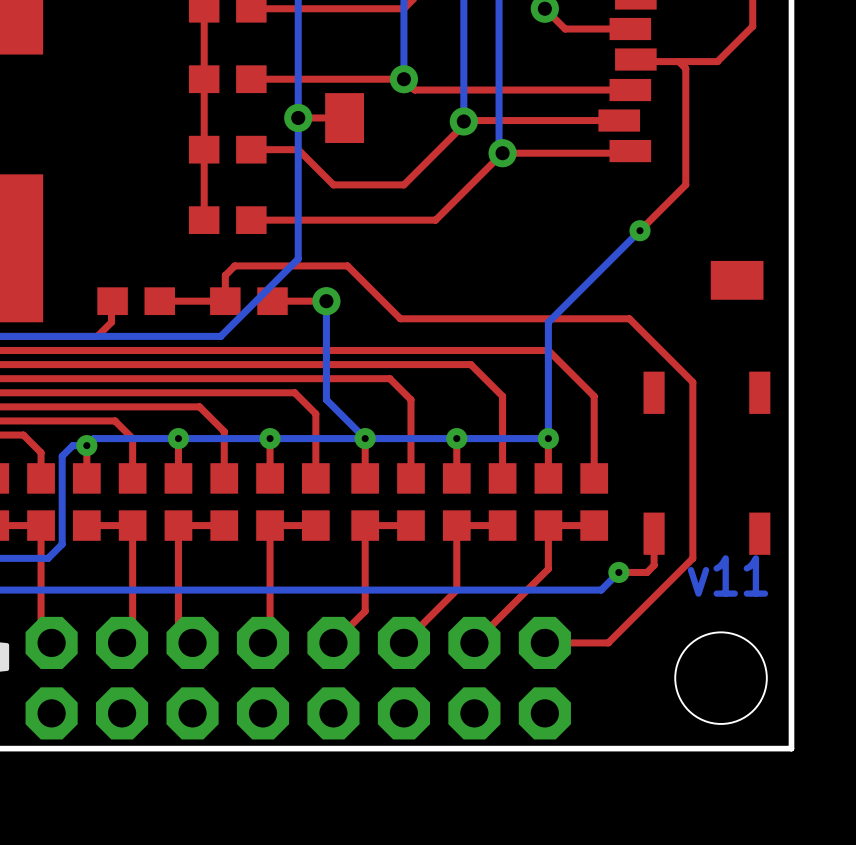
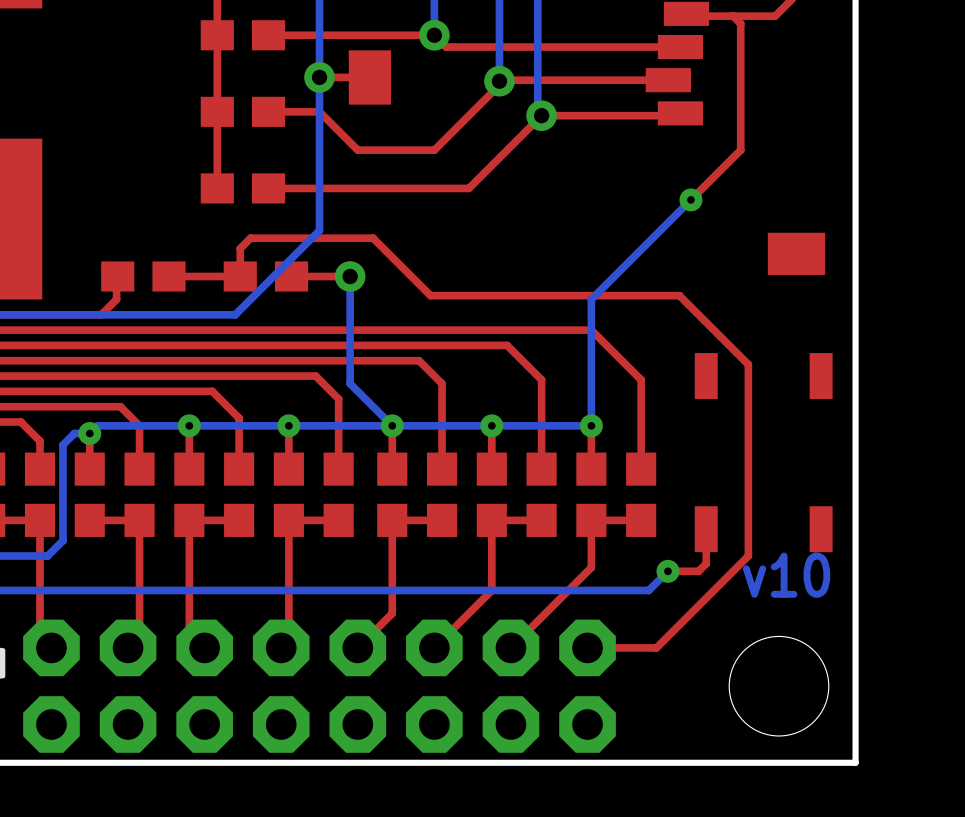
text: v11 (727, 575) -> v10 (786, 575)

